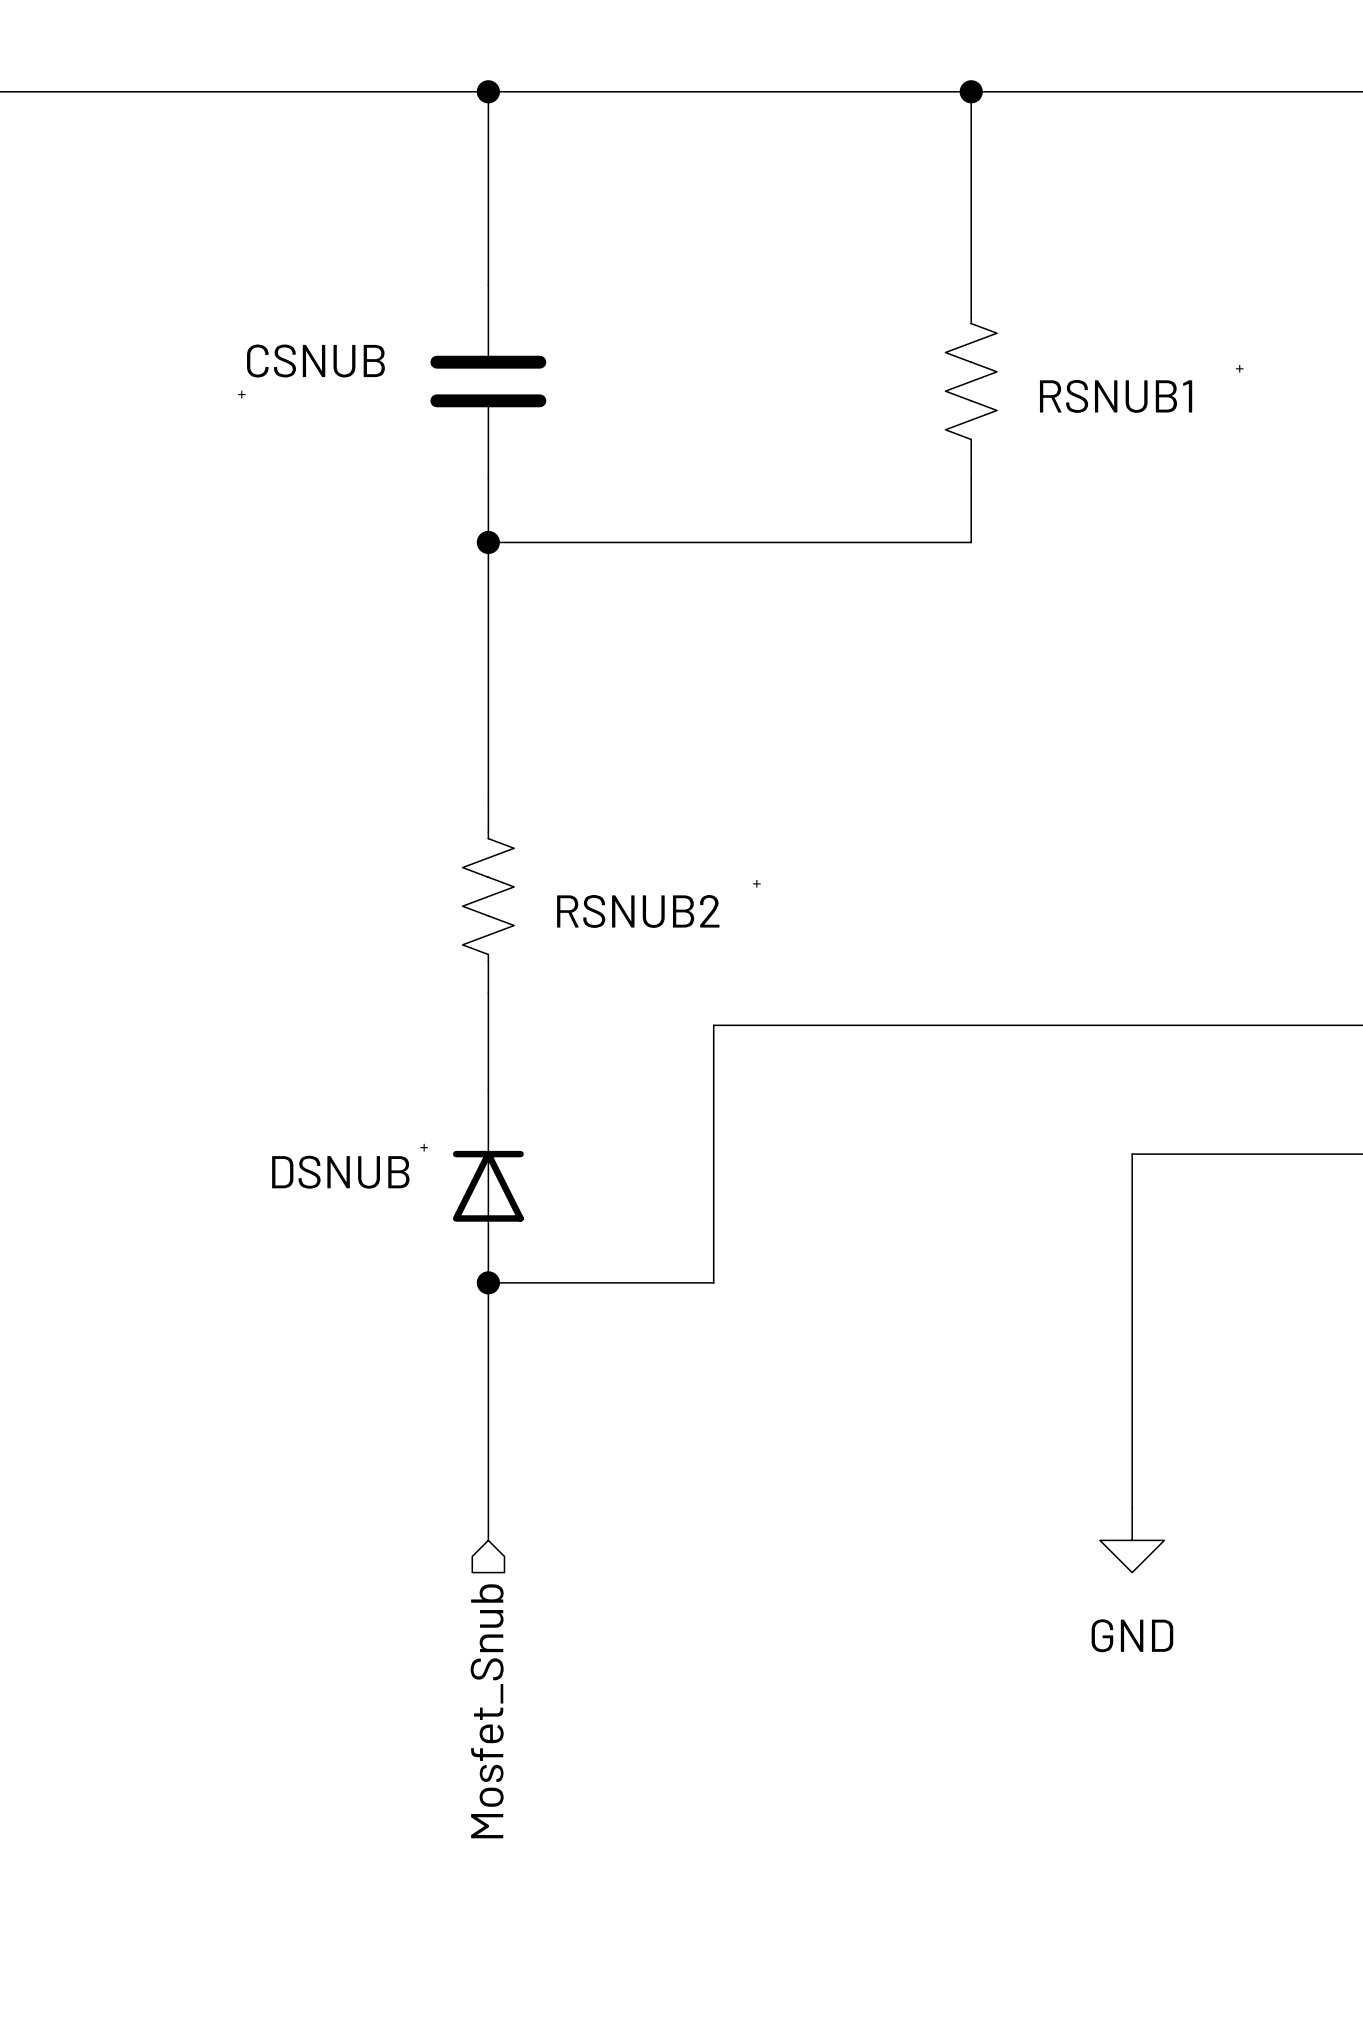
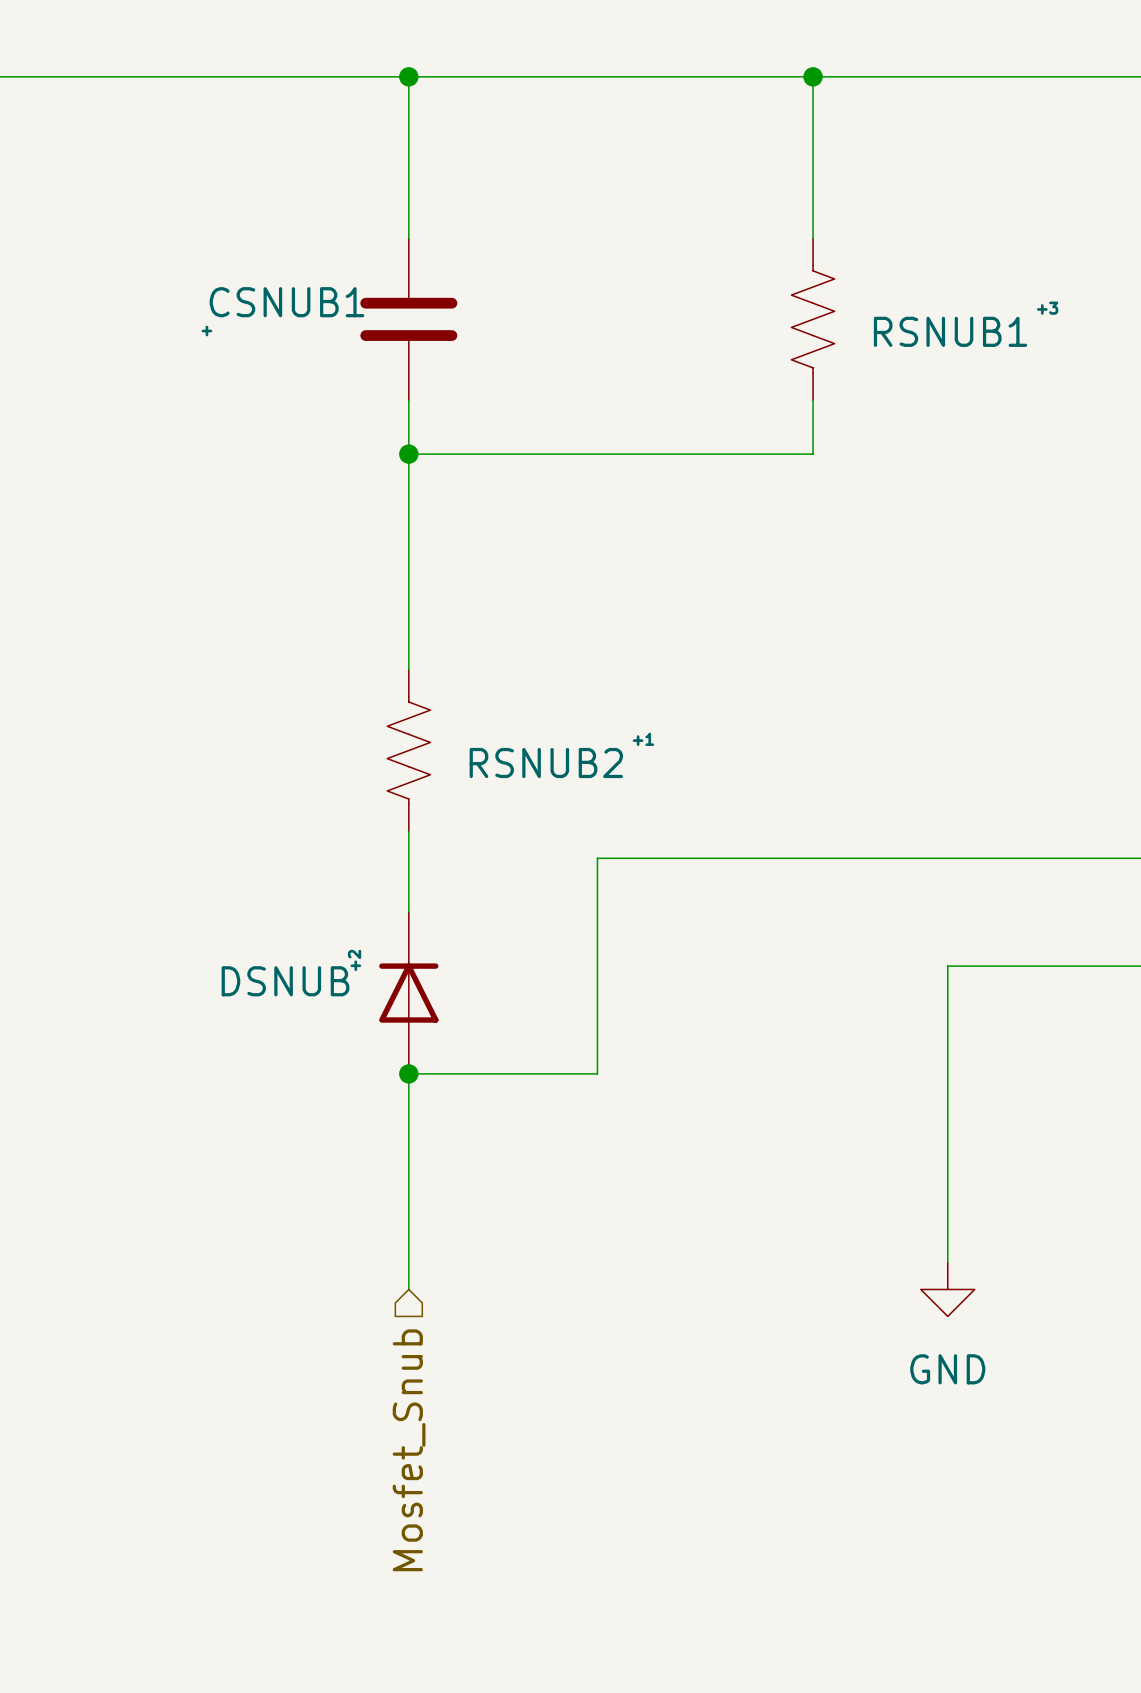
CSNUB name: CSNUB (315, 361) -> CSNUB1 (286, 302)
+3 name: + (1239, 368) -> +3 (1047, 308)
+1 name: + (756, 883) -> +1 (643, 739)
+2 name: + (424, 1147) -> +2 (354, 960)

